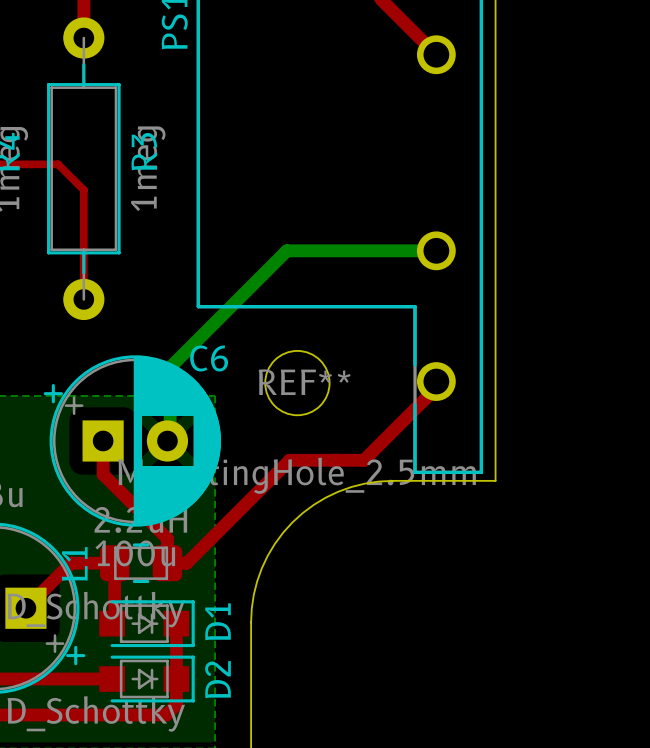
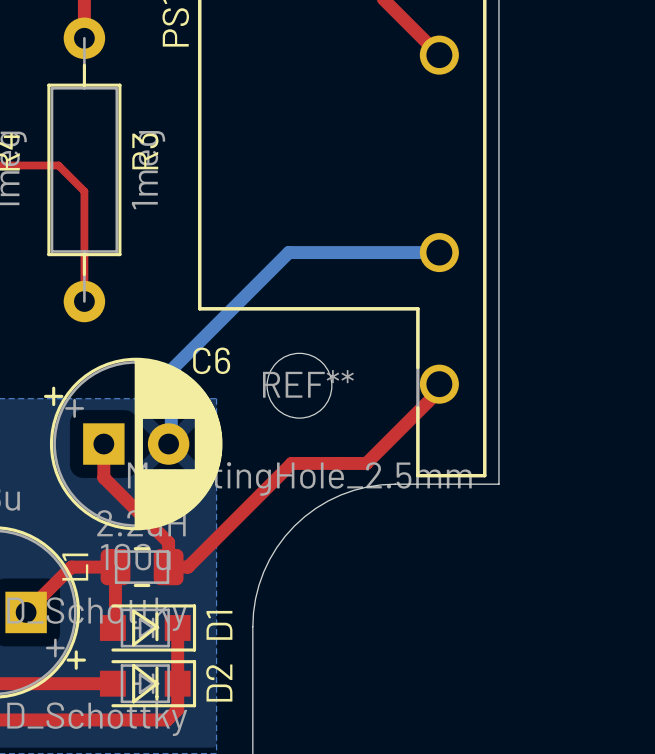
line: none -> (133, 611) (133, 644) (156, 626) (133, 611)
line: none -> (156, 613) (156, 639)
line: none -> (133, 665) (156, 683) (133, 701) (133, 665)
line: none -> (156, 668) (156, 699)

